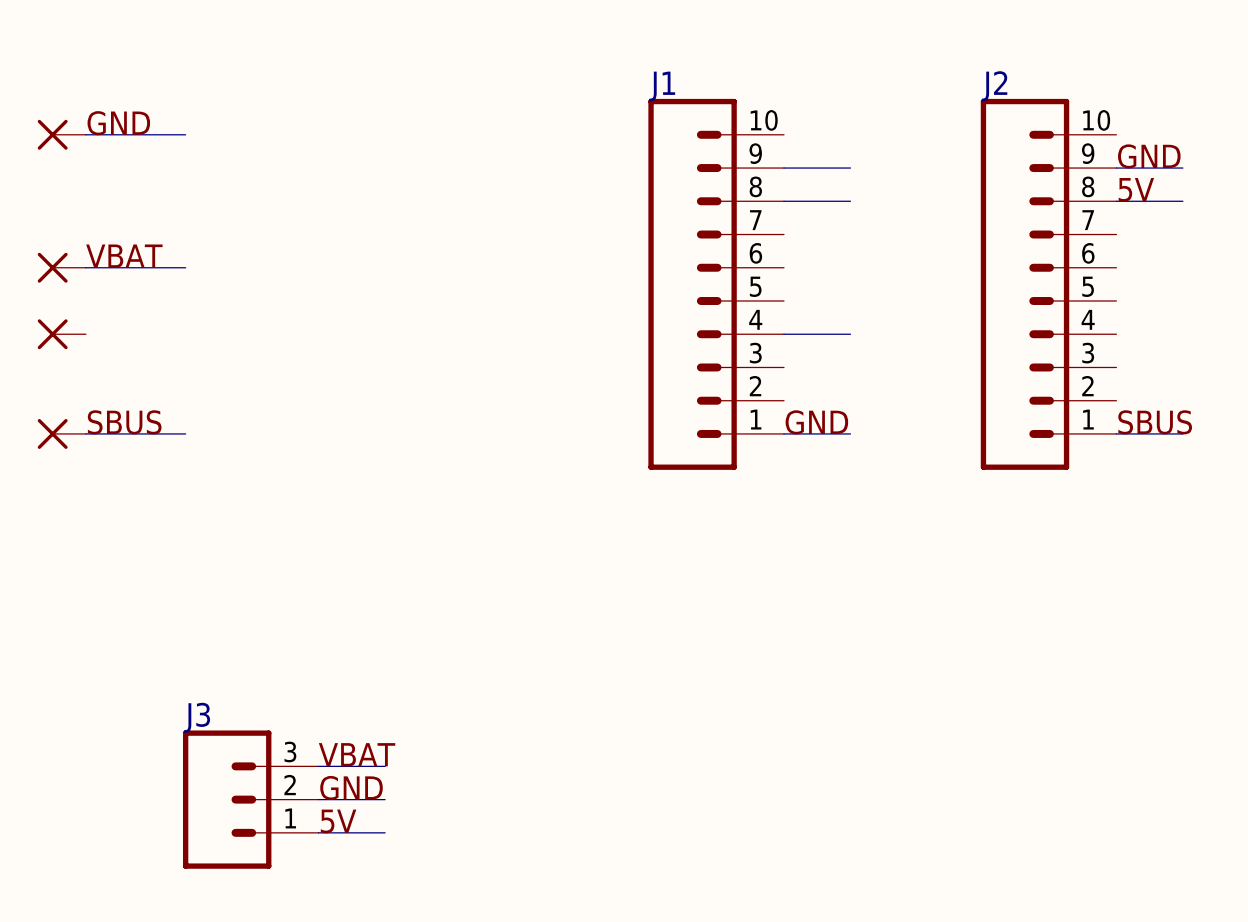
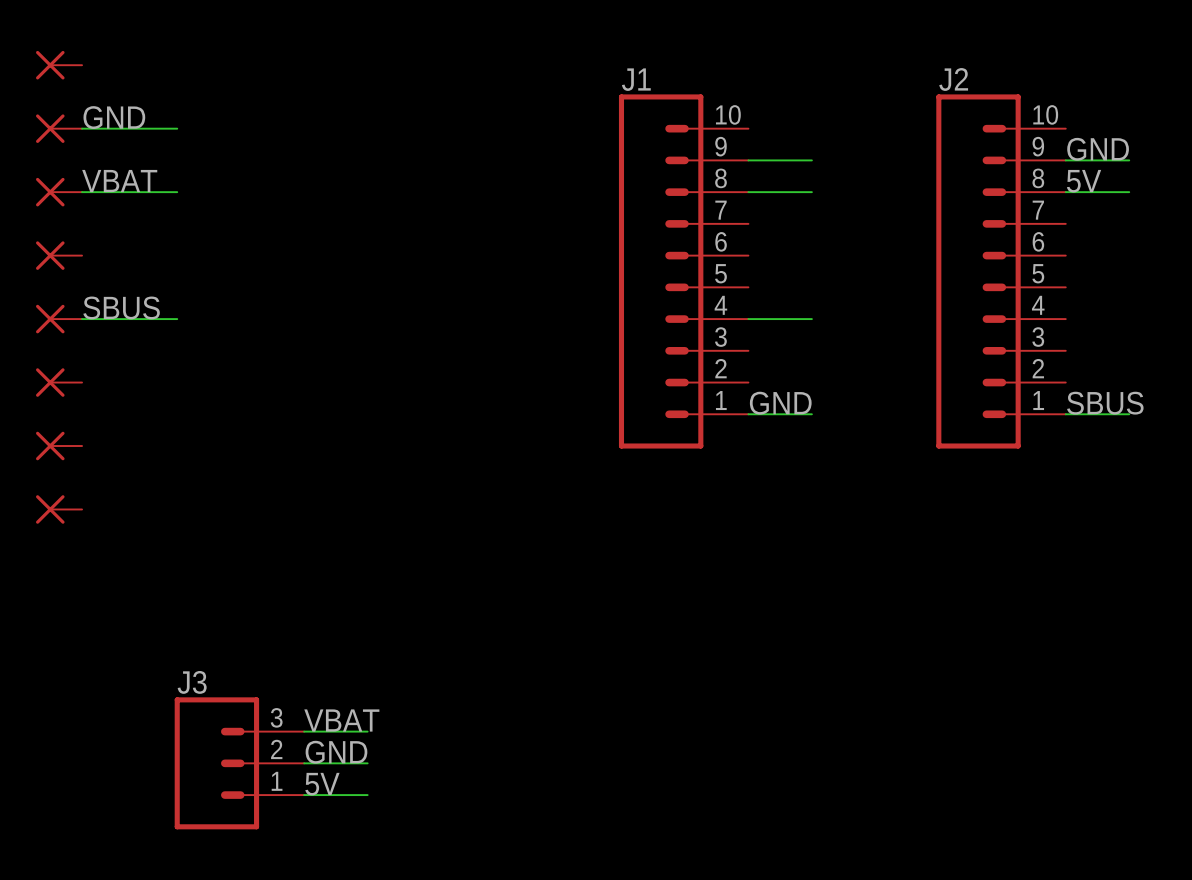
part: none -> (59, 65)
part: none -> (59, 192)
label position: VBAT (124, 256) -> VBAT (119, 181)
wire: (85, 267) (185, 267) -> (82, 192) (177, 192)
part: none -> (59, 382)
label position: SBUS (124, 422) -> SBUS (121, 307)
part: (61, 433) -> none
wire: (85, 433) (185, 433) -> (82, 319) (177, 319)
part: none -> (59, 446)
part: none -> (59, 509)

